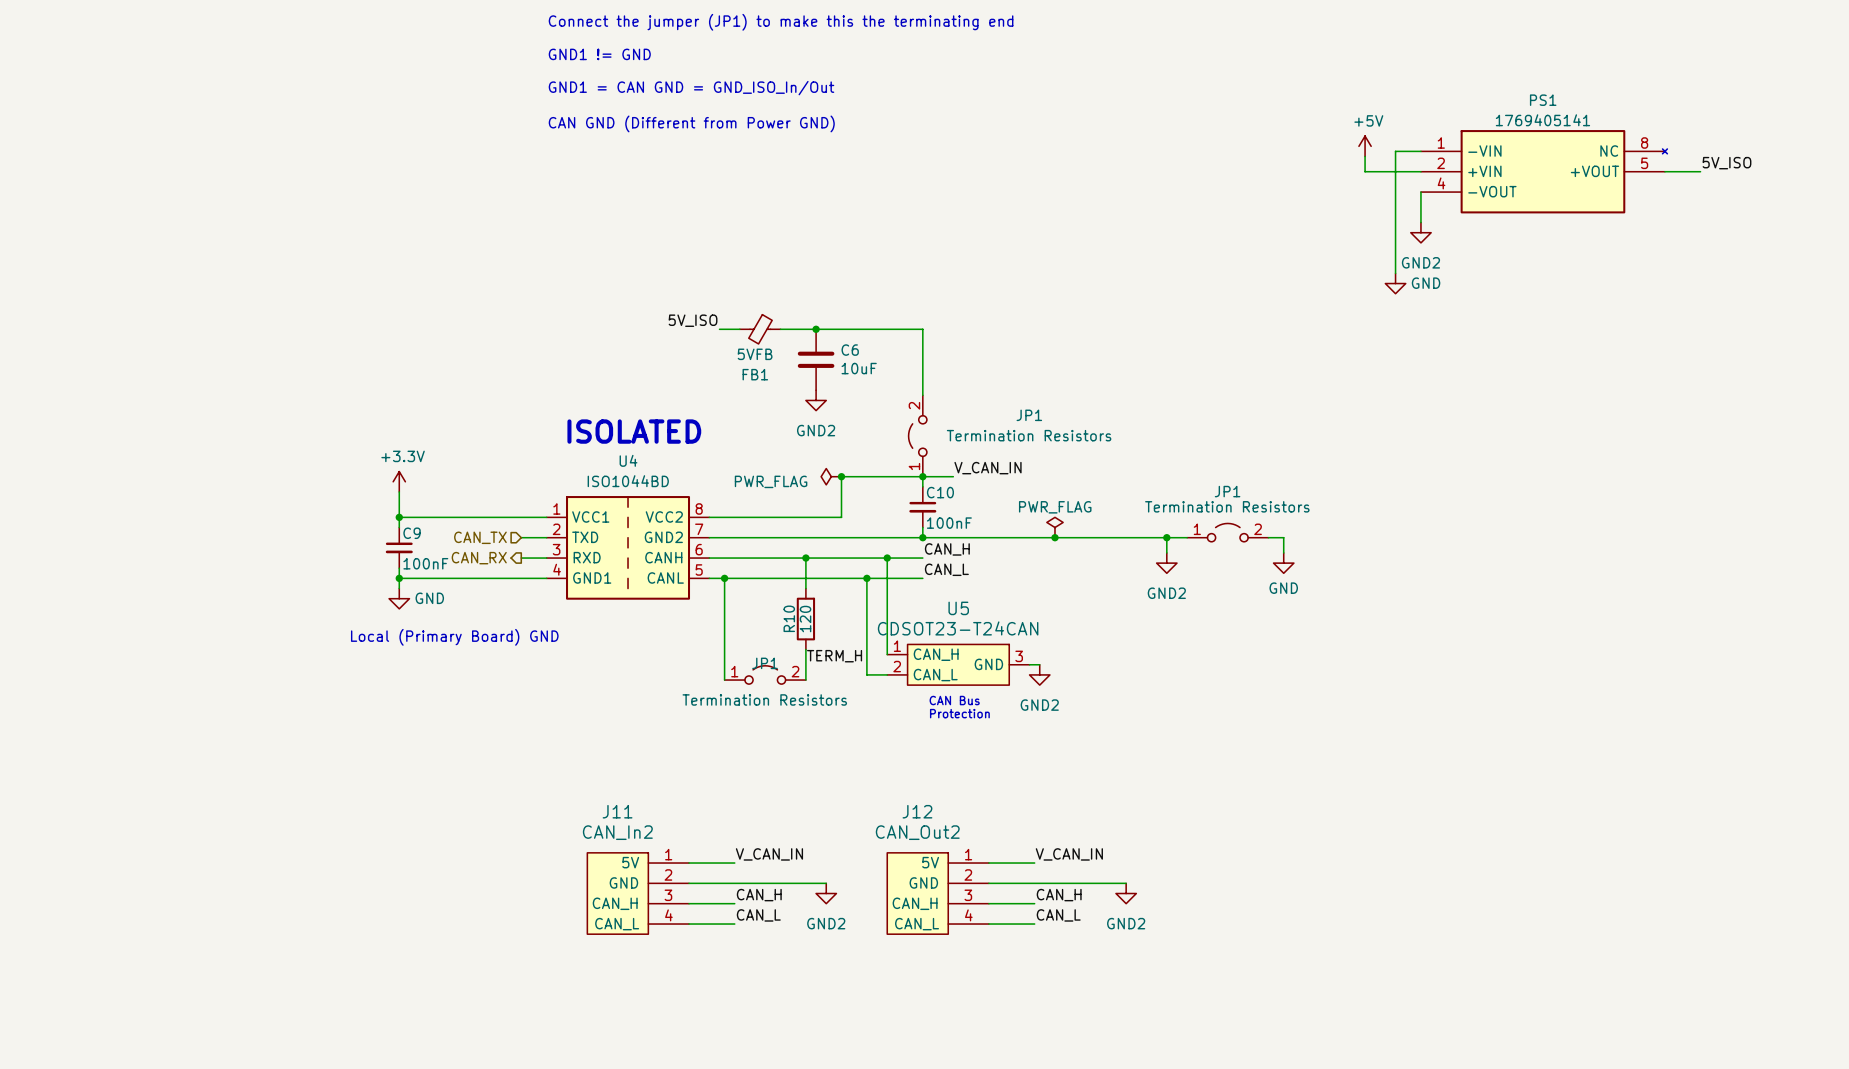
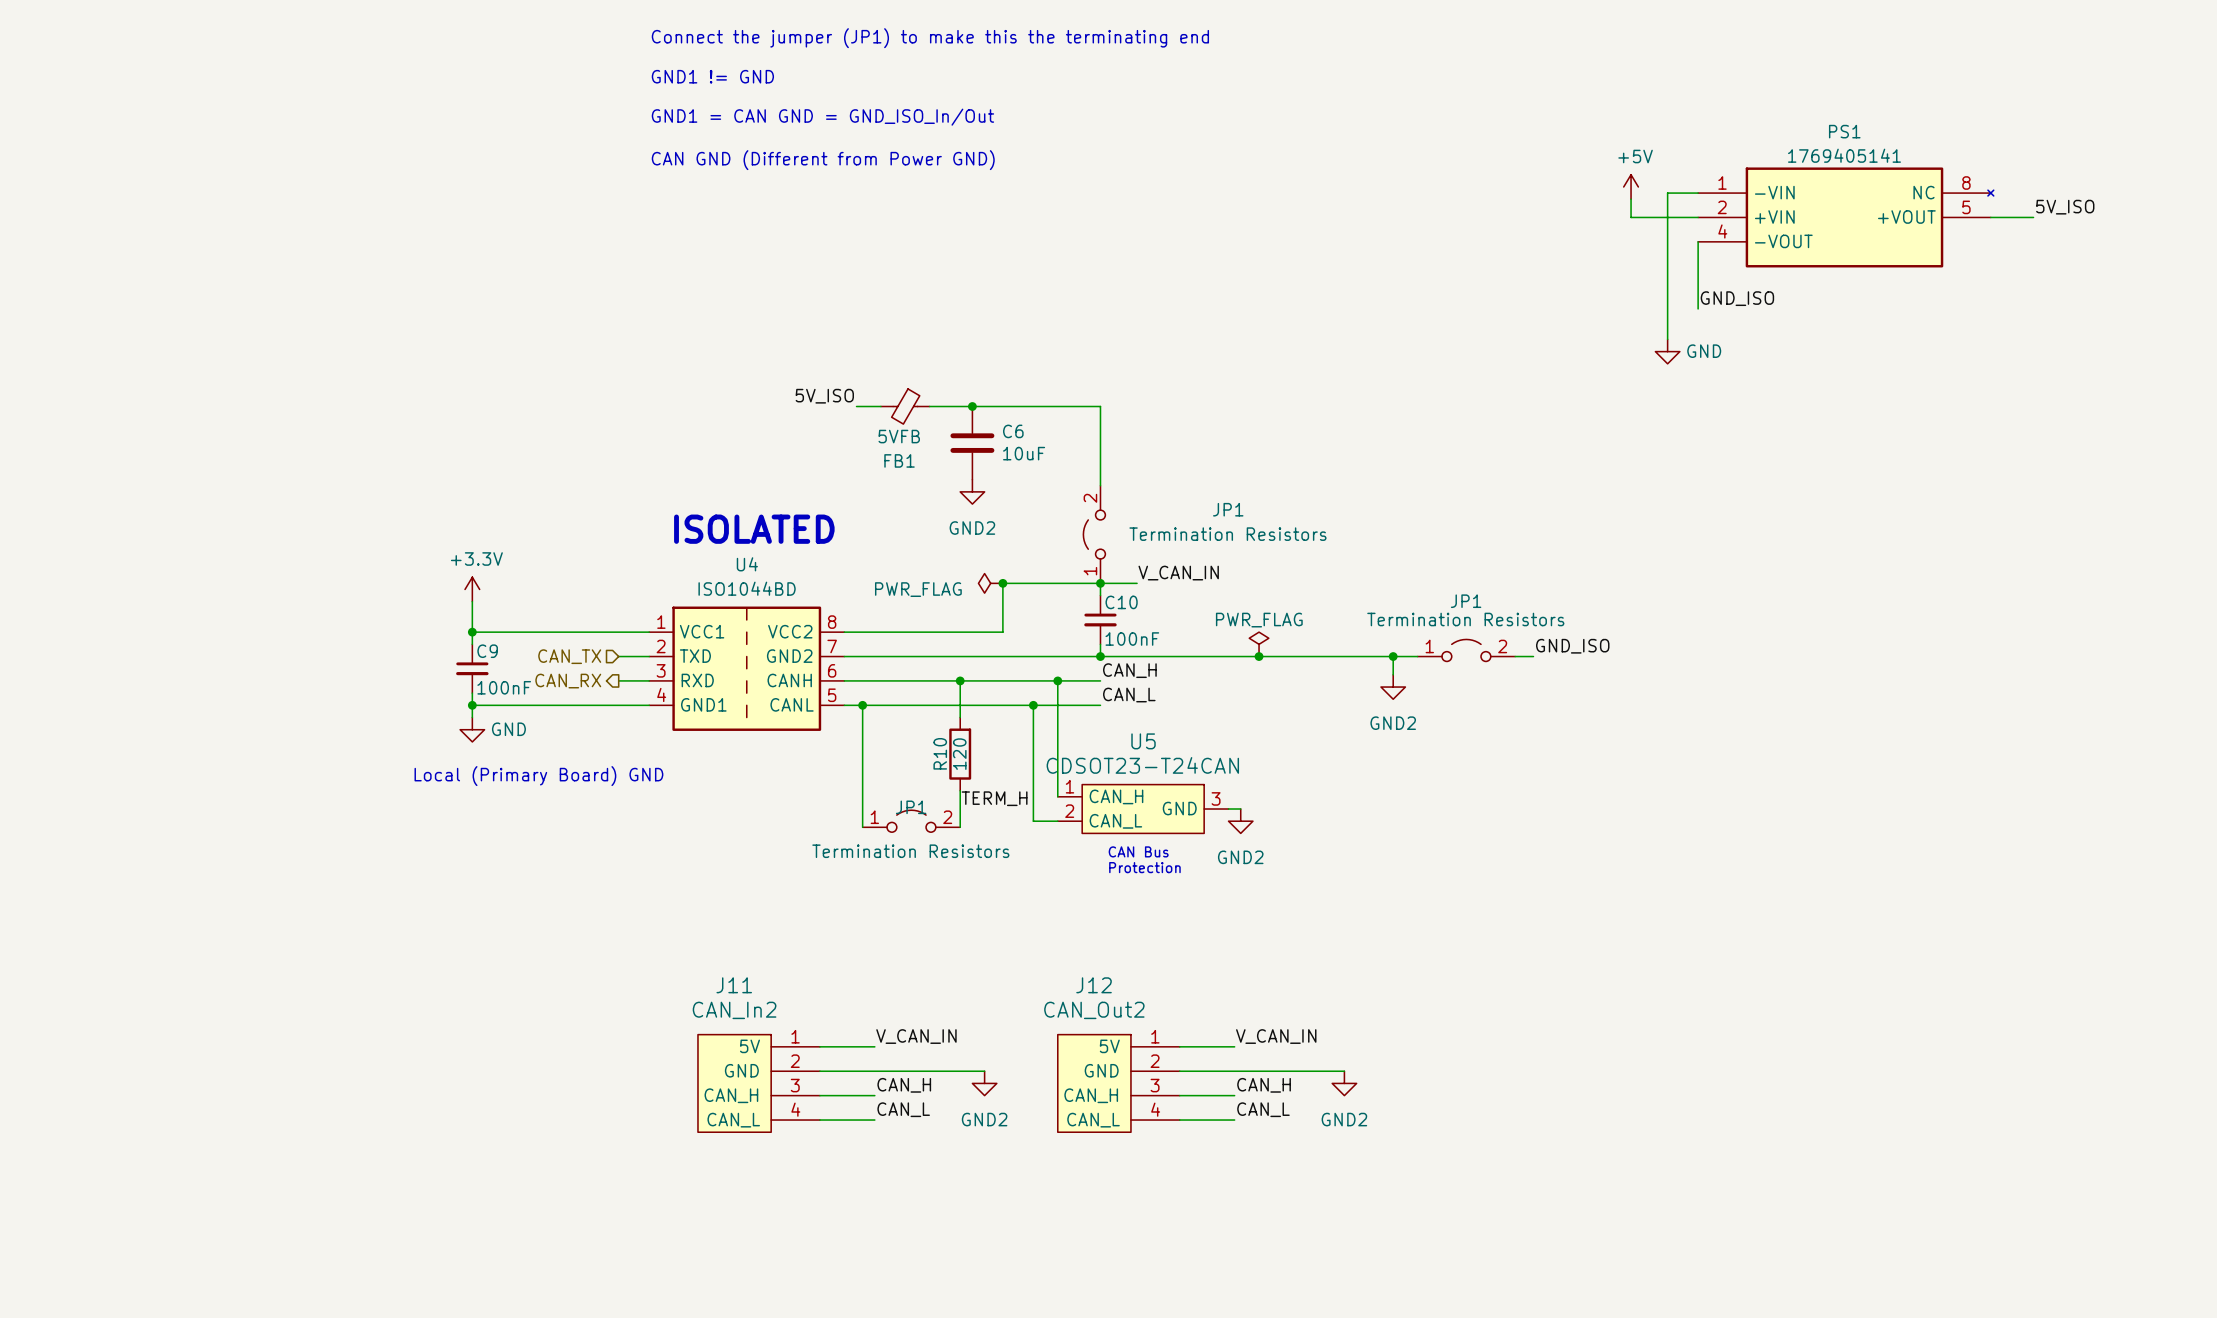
wire: none -> (1698, 278) (1698, 308)
power symbol: GND2 (1420, 232) -> none
label: none -> GND_ISO (1737, 298)
label: none -> GND_ISO (1572, 646)
wire: (1283, 537) (1283, 552) -> none
power symbol: GND (1283, 563) -> none

